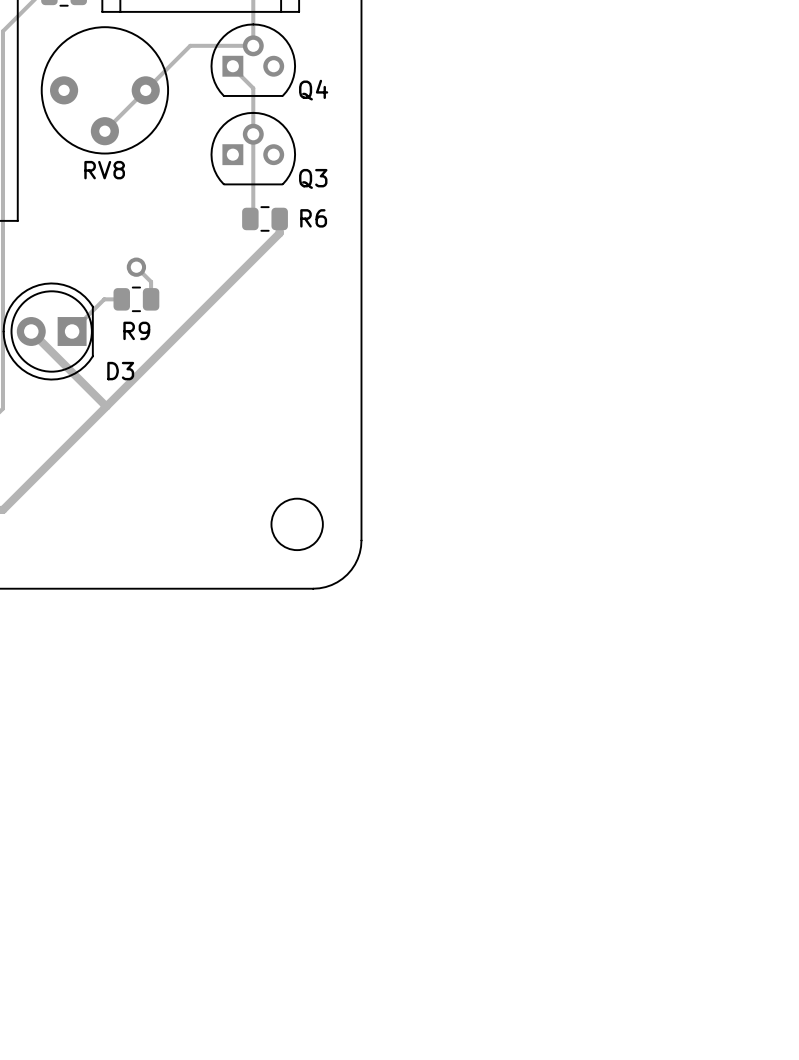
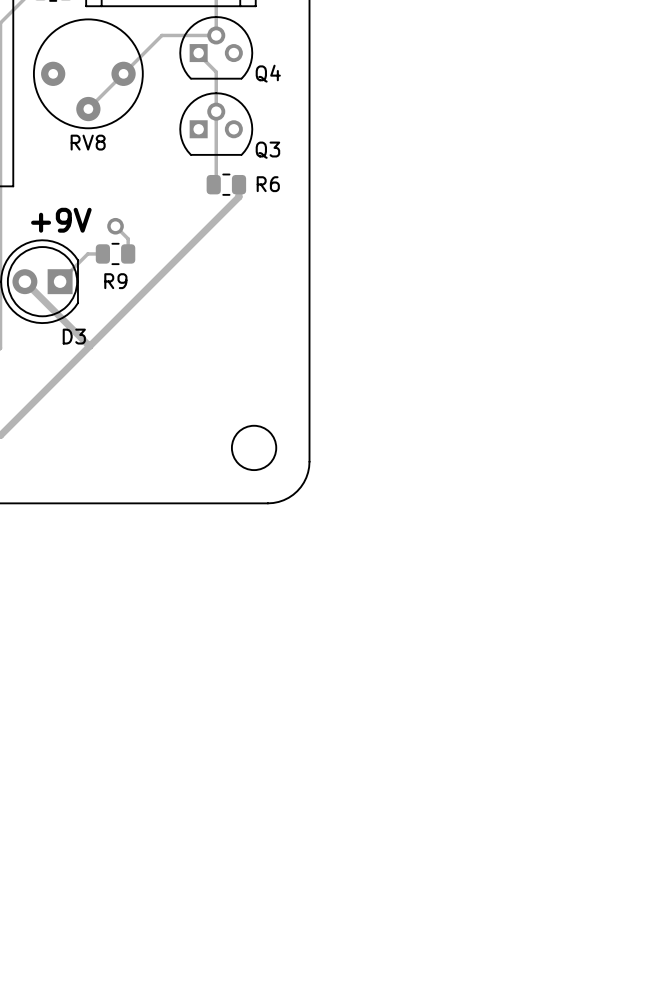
text: none -> +9V (61, 220)
D3 name position: D3 (120, 371) -> D3 (74, 336)

